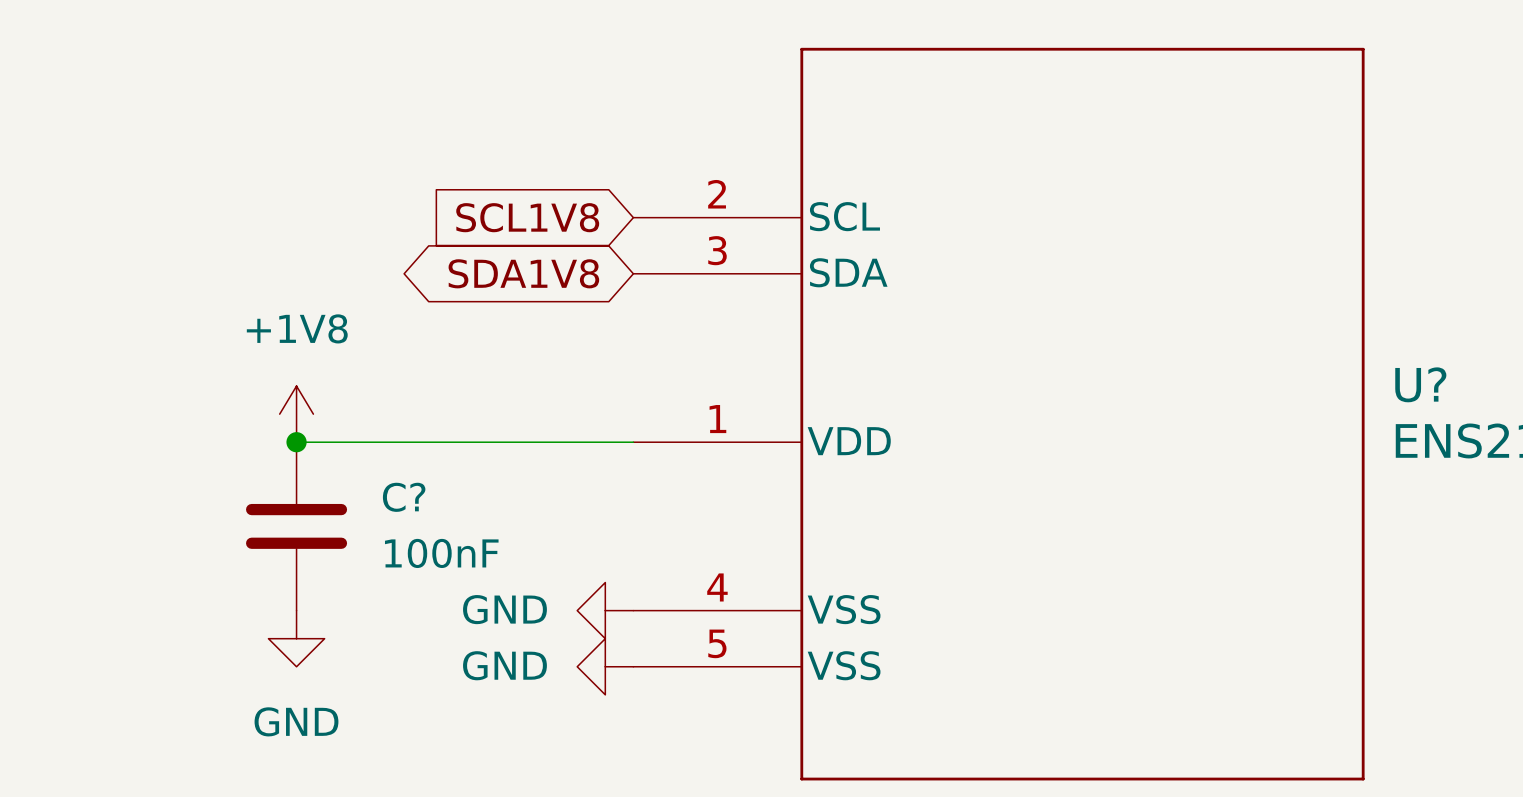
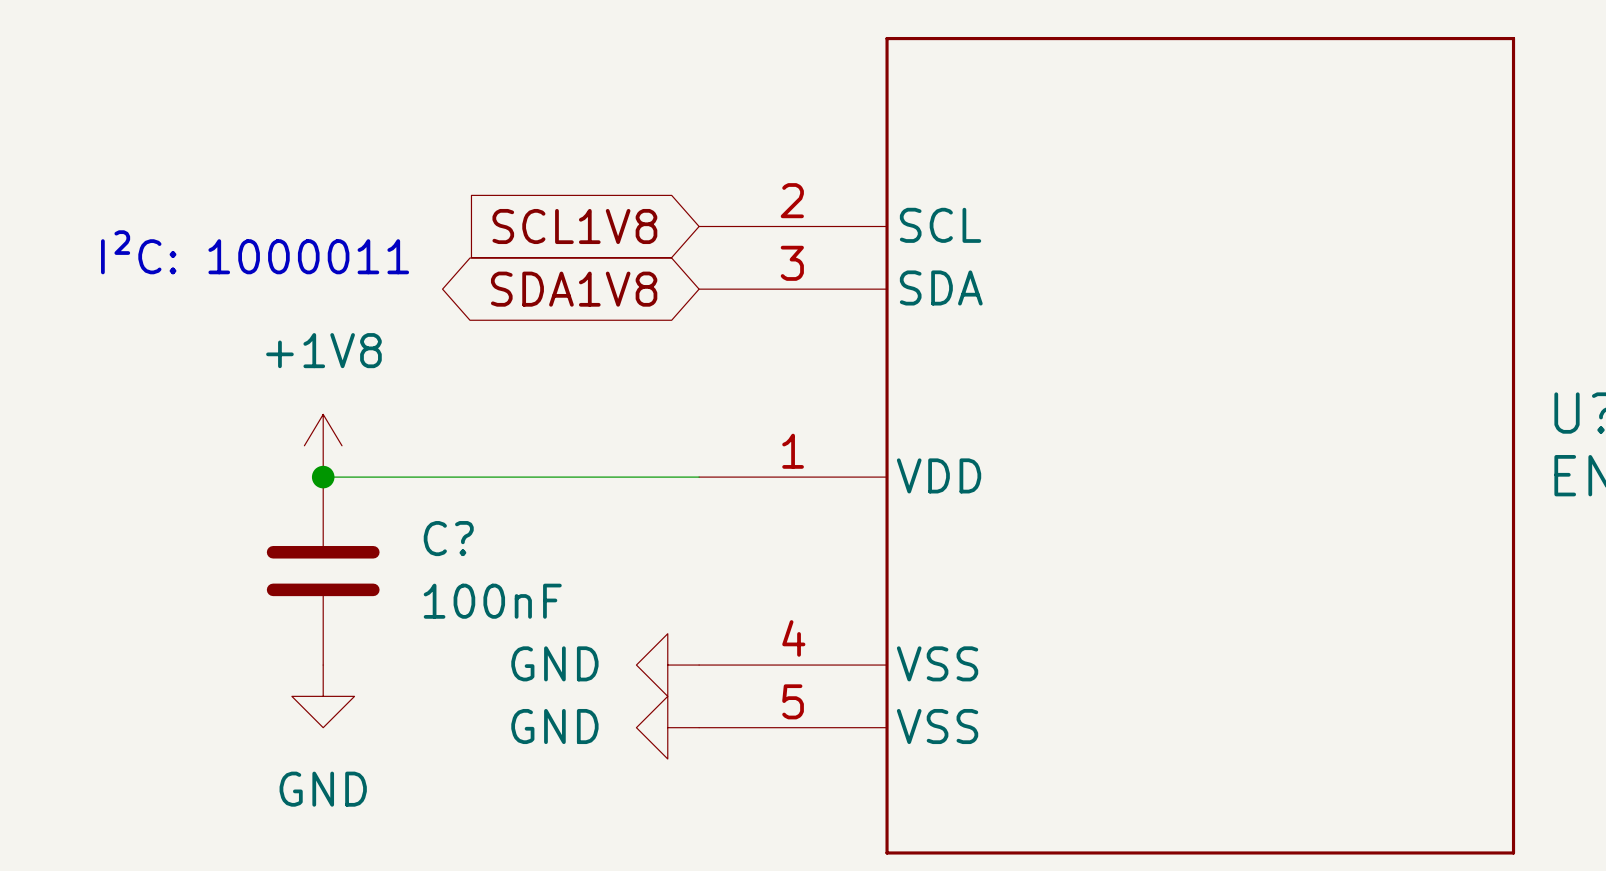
text: none -> I²C: 1000011 (255, 252)

